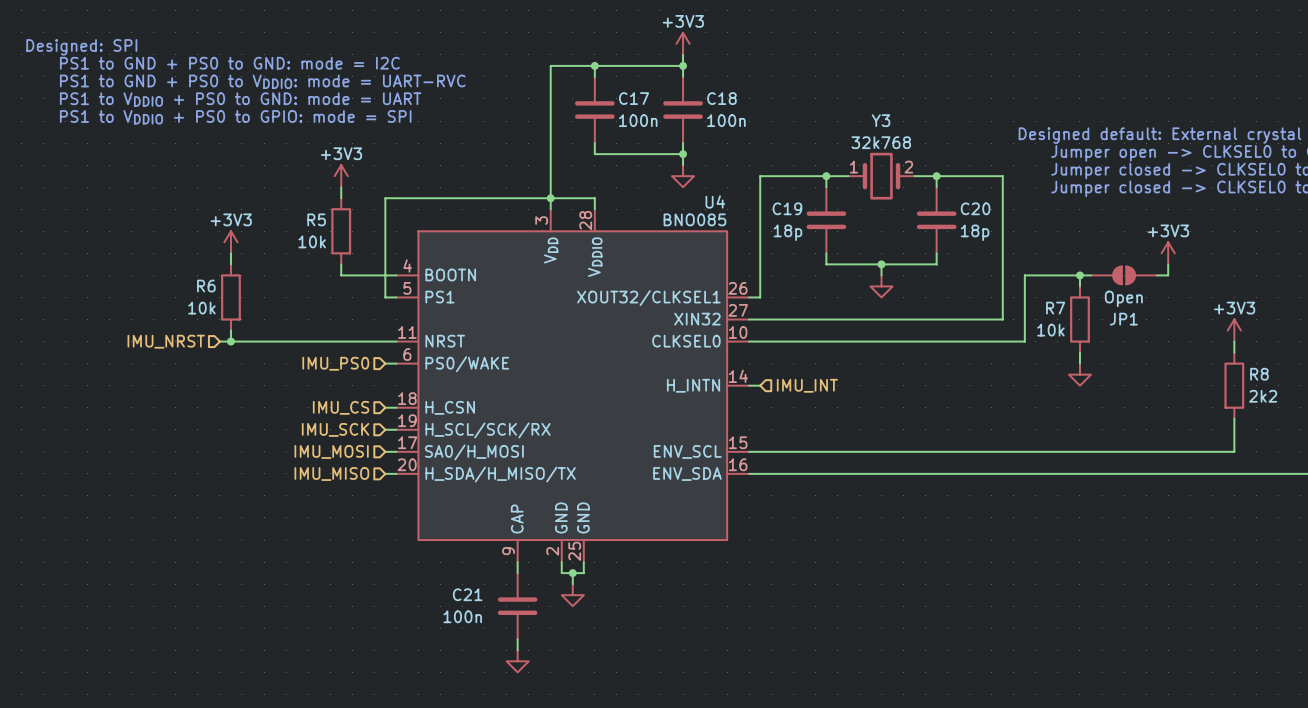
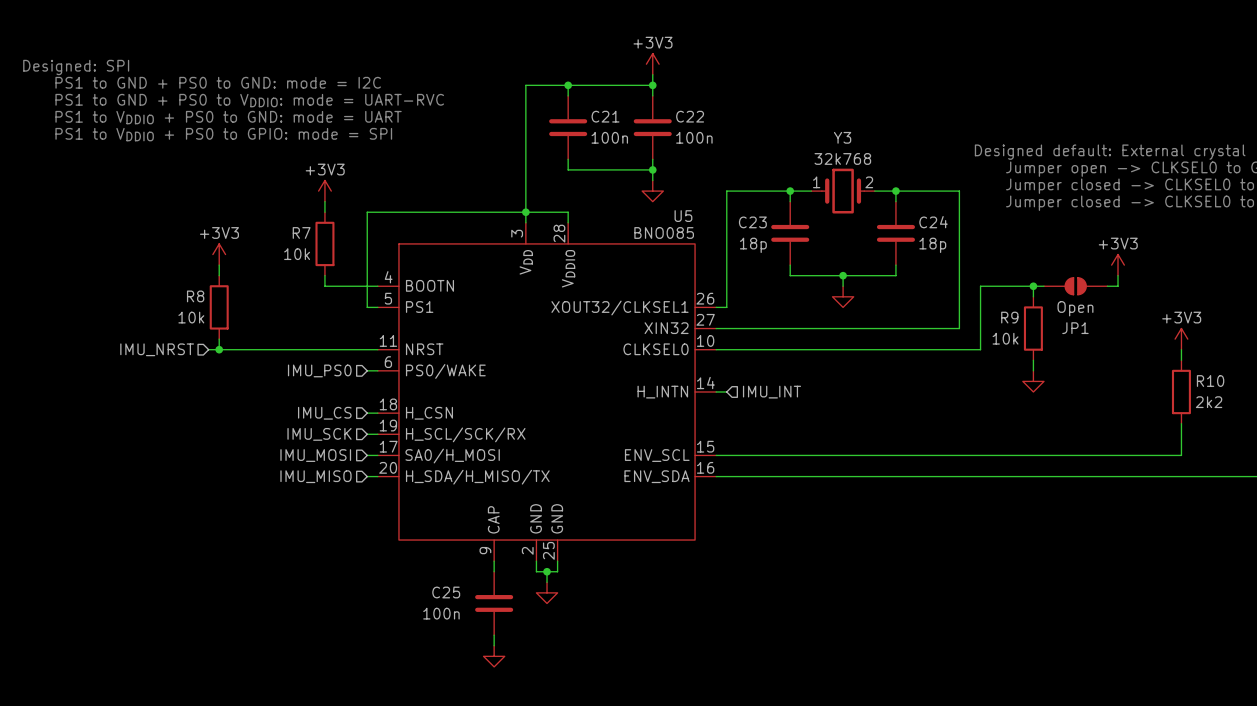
C17 name: C17 (634, 98) -> C21 (605, 116)
C18 name: C18 (721, 98) -> C22 (690, 116)
U4 name: U4 (715, 201) -> U5 (683, 216)
C19 name: C19 (787, 208) -> C23 (752, 222)
C20 name: C20 (975, 208) -> C24 (933, 222)
R5 name: R5 (316, 219) -> R7 (301, 232)
R6 name: R6 (206, 286) -> R8 (195, 296)
R7 name: R7 (1055, 308) -> R9 (1009, 317)
R8 name: R8 (1259, 374) -> R10 (1210, 381)
C21 name: C21 (467, 594) -> C25 (446, 592)

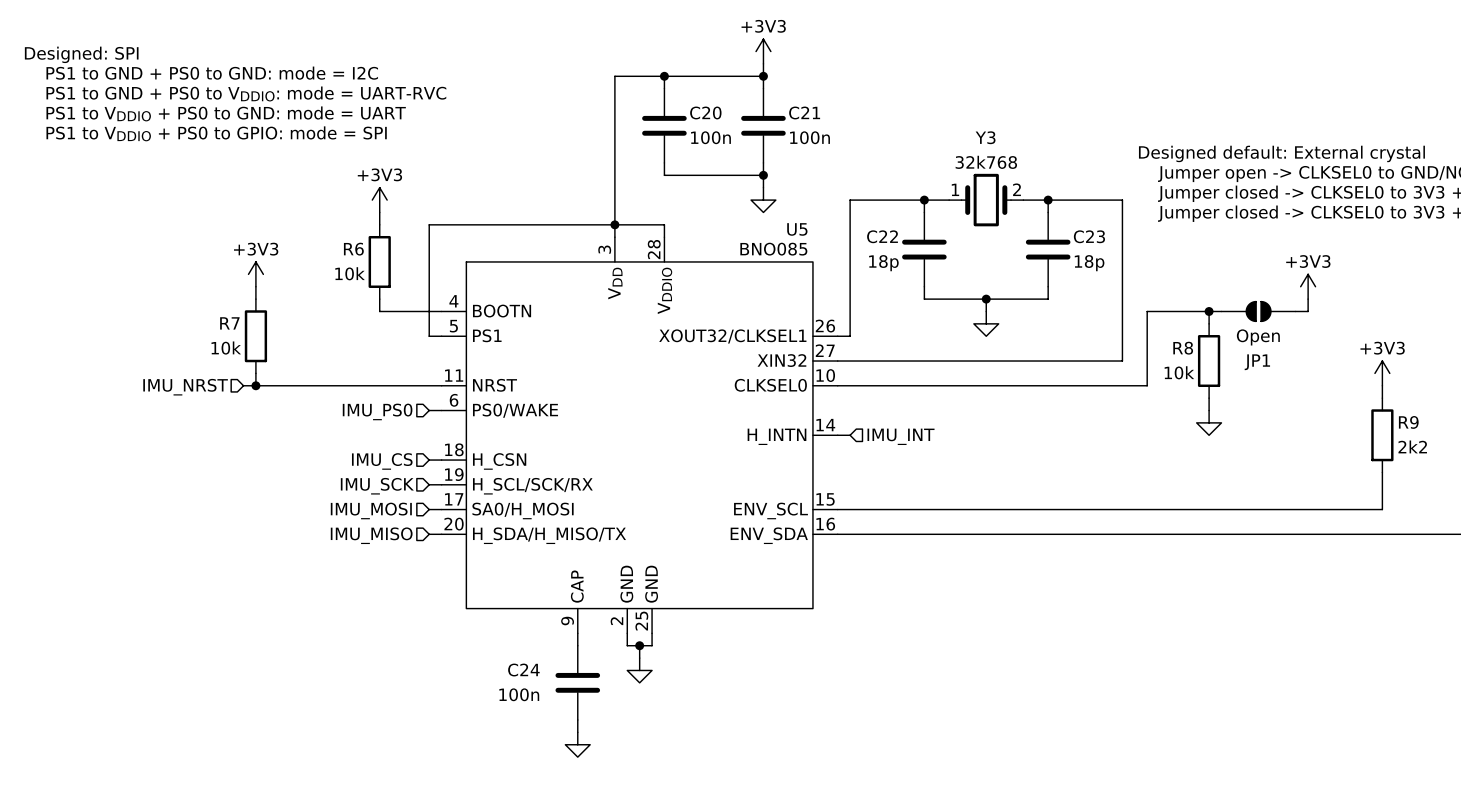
C21 name: C21 (605, 116) -> C20 (705, 112)
C22 name: C22 (690, 116) -> C21 (804, 112)
C23 name: C23 (752, 222) -> C22 (882, 236)
C24 name: C24 (933, 222) -> C23 (1089, 236)
R7 name: R7 (301, 232) -> R6 (353, 249)
R8 name: R8 (195, 296) -> R7 (229, 323)
R9 name: R9 (1009, 317) -> R8 (1183, 348)
R10 name: R10 (1210, 381) -> R9 (1408, 422)
C25 name: C25 (446, 592) -> C24 (523, 670)

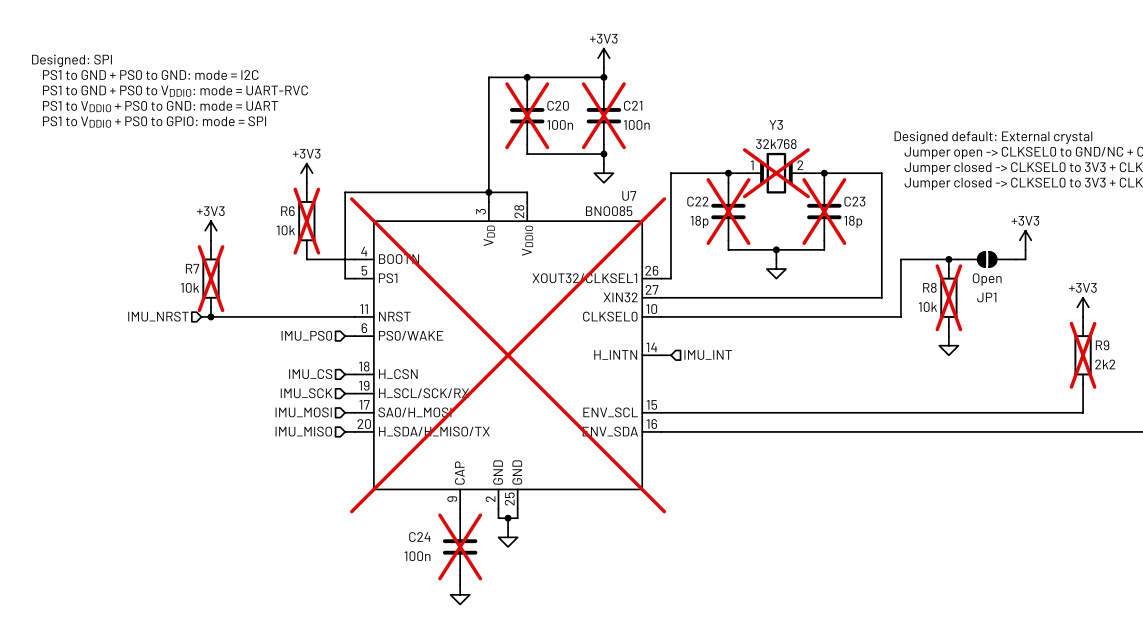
C20 do-not-place cross: none -> (527, 115)
C21 do-not-place cross: none -> (603, 115)
Y3 do-not-place cross: none -> (776, 173)
U5 name: U5 (797, 229) -> U7 (629, 195)
C22 do-not-place cross: none -> (728, 211)
C23 do-not-place cross: none -> (824, 211)
R6 do-not-place cross: none -> (306, 221)
R7 do-not-place cross: none -> (210, 278)
R8 do-not-place cross: none -> (948, 297)
U5 do-not-place cross: none -> (508, 355)
R9 do-not-place cross: none -> (1083, 355)
C24 do-not-place cross: none -> (460, 546)

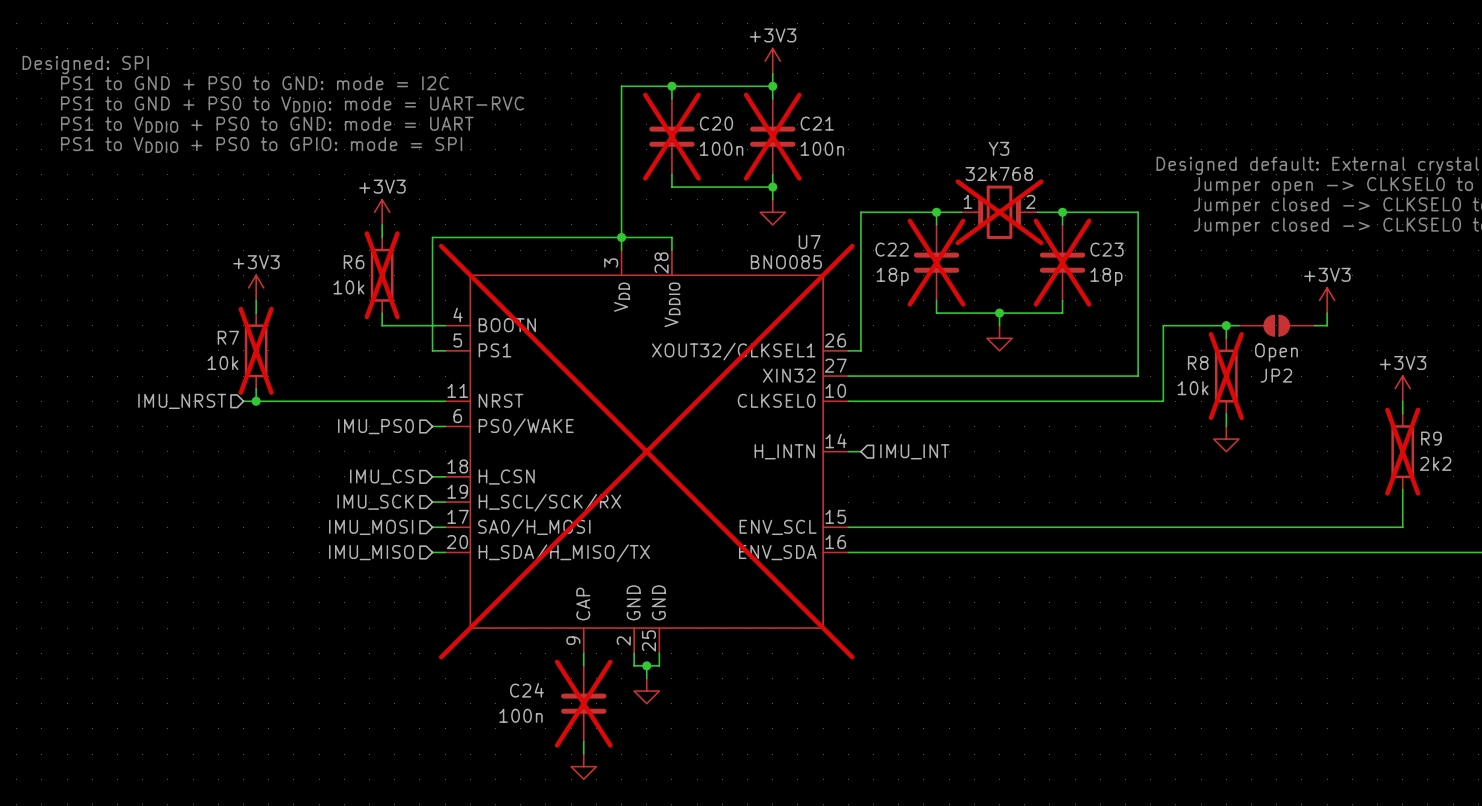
JP1 name: JP1 (986, 297) -> JP2 (1276, 375)

